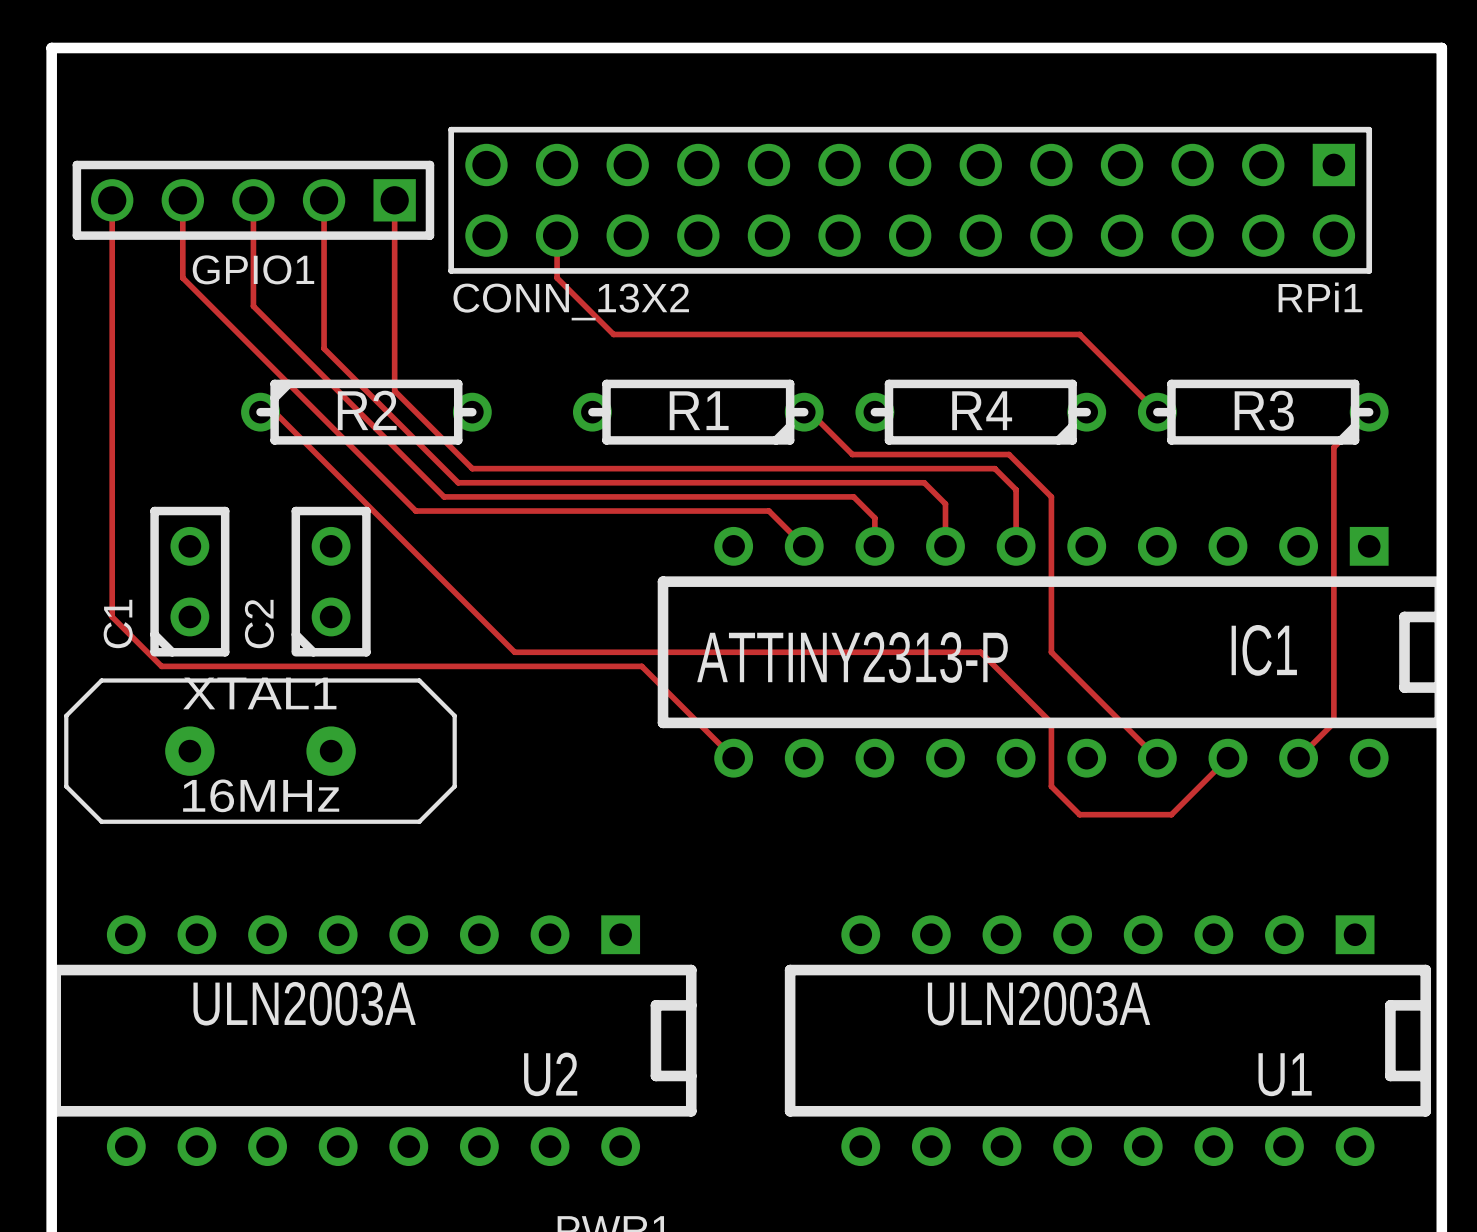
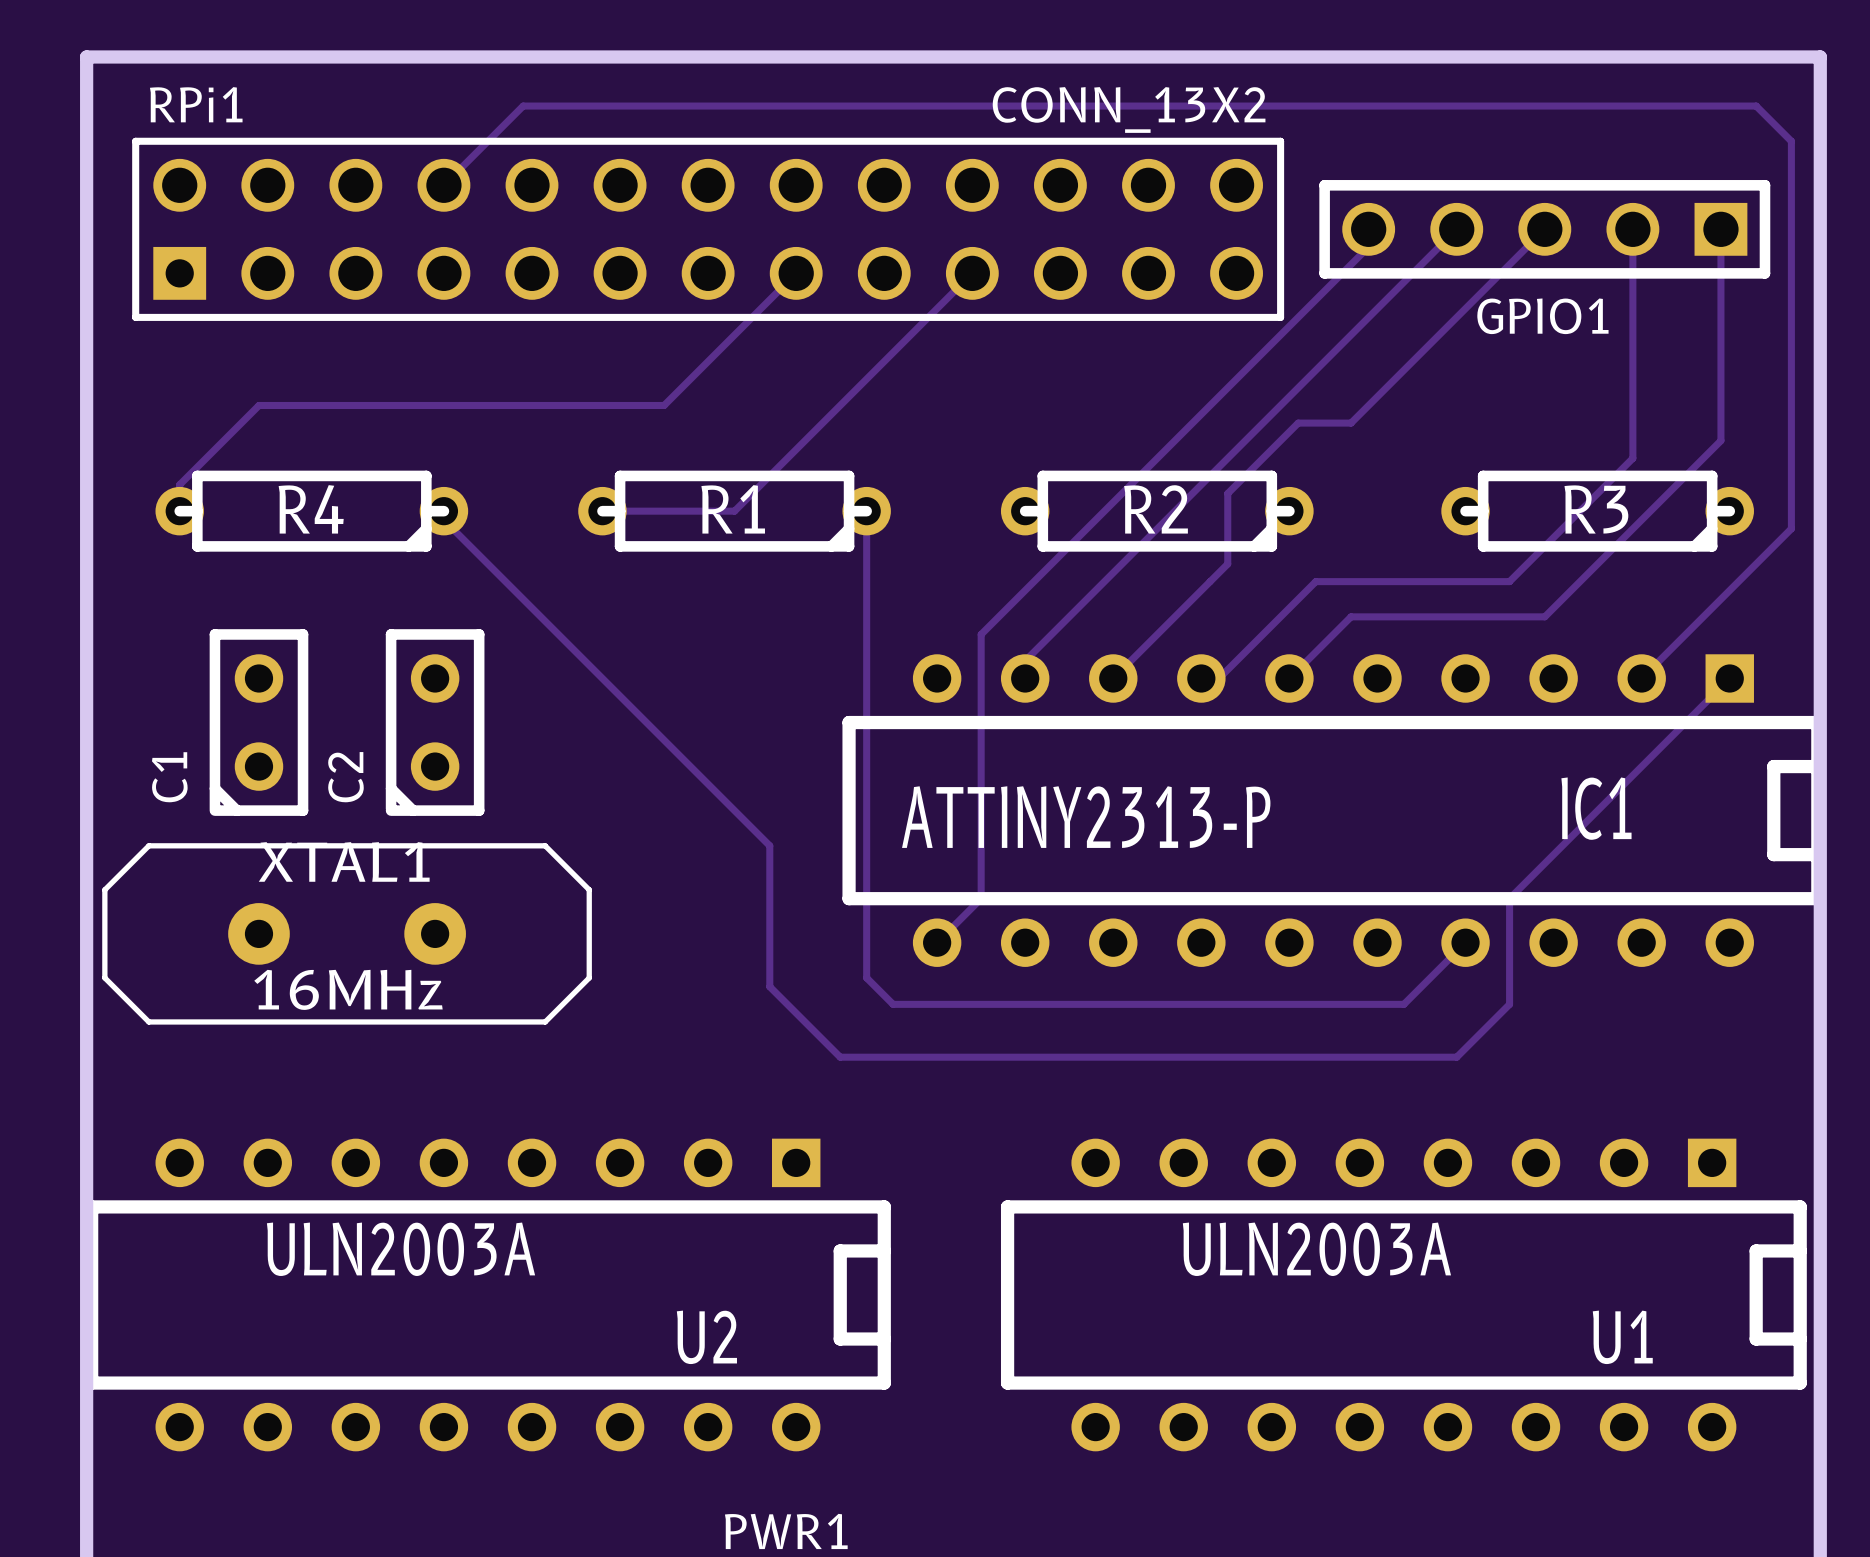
track: none -> (443, 185) (523, 106) (1756, 106) (1791, 141) (1791, 528) (1641, 678)
track: (112, 200) (112, 616) (161, 666) (641, 666) (733, 758) -> (1368, 229) (1368, 246) (981, 634) (981, 898) (937, 942)
track: (182, 200) (182, 277) (415, 511) (768, 511) (804, 546) -> (1456, 229) (1025, 660) (1025, 678)
track: (253, 200) (253, 306) (444, 496) (853, 496) (874, 518) (874, 546) -> (1544, 229) (1351, 423) (1298, 423) (1227, 493) (1227, 564) (1113, 678)
GPIO1 position: (253, 200) -> (1544, 229)
track: (324, 200) (324, 348) (458, 482) (924, 482) (945, 503) (945, 546) -> (1632, 229) (1632, 458) (1509, 581) (1315, 581) (1218, 678) (1201, 678)
track: (394, 200) (394, 390) (472, 468) (994, 468) (1016, 489) (1016, 546) -> (1720, 229) (1720, 440) (1544, 616) (1351, 616) (1289, 678)
RPi1 rotation: 0° (910, 200) -> 180° (708, 229)
track: none -> (796, 273) (664, 405) (258, 405) (179, 484) (179, 511)
track: none -> (972, 273) (734, 511) (602, 511)
track: (557, 235) (557, 277) (613, 334) (1079, 334) (1157, 412) -> none
track: (260, 412) (274, 412) (514, 652) (980, 652) (1051, 722) (1051, 786) (1079, 814) (1171, 814) (1227, 758) -> none
track: none -> (443, 511) (443, 519) (769, 845) (769, 986) (840, 1057) (1456, 1057) (1509, 1004) (1509, 898) (1729, 678)
R2 rotation: 0° (366, 412) -> 180° (1157, 511)
R2 position: (366, 412) -> (1157, 511)
R1 position: (698, 412) -> (734, 511)
track: (804, 412) (810, 412) (852, 454) (1009, 454) (1051, 496) (1051, 652) (1157, 758) -> (866, 511) (866, 977) (893, 1004) (1403, 1004) (1465, 942)
R4 position: (980, 412) -> (311, 511)
track: (1369, 412) (1333, 447) (1333, 722) (1298, 758) -> none

